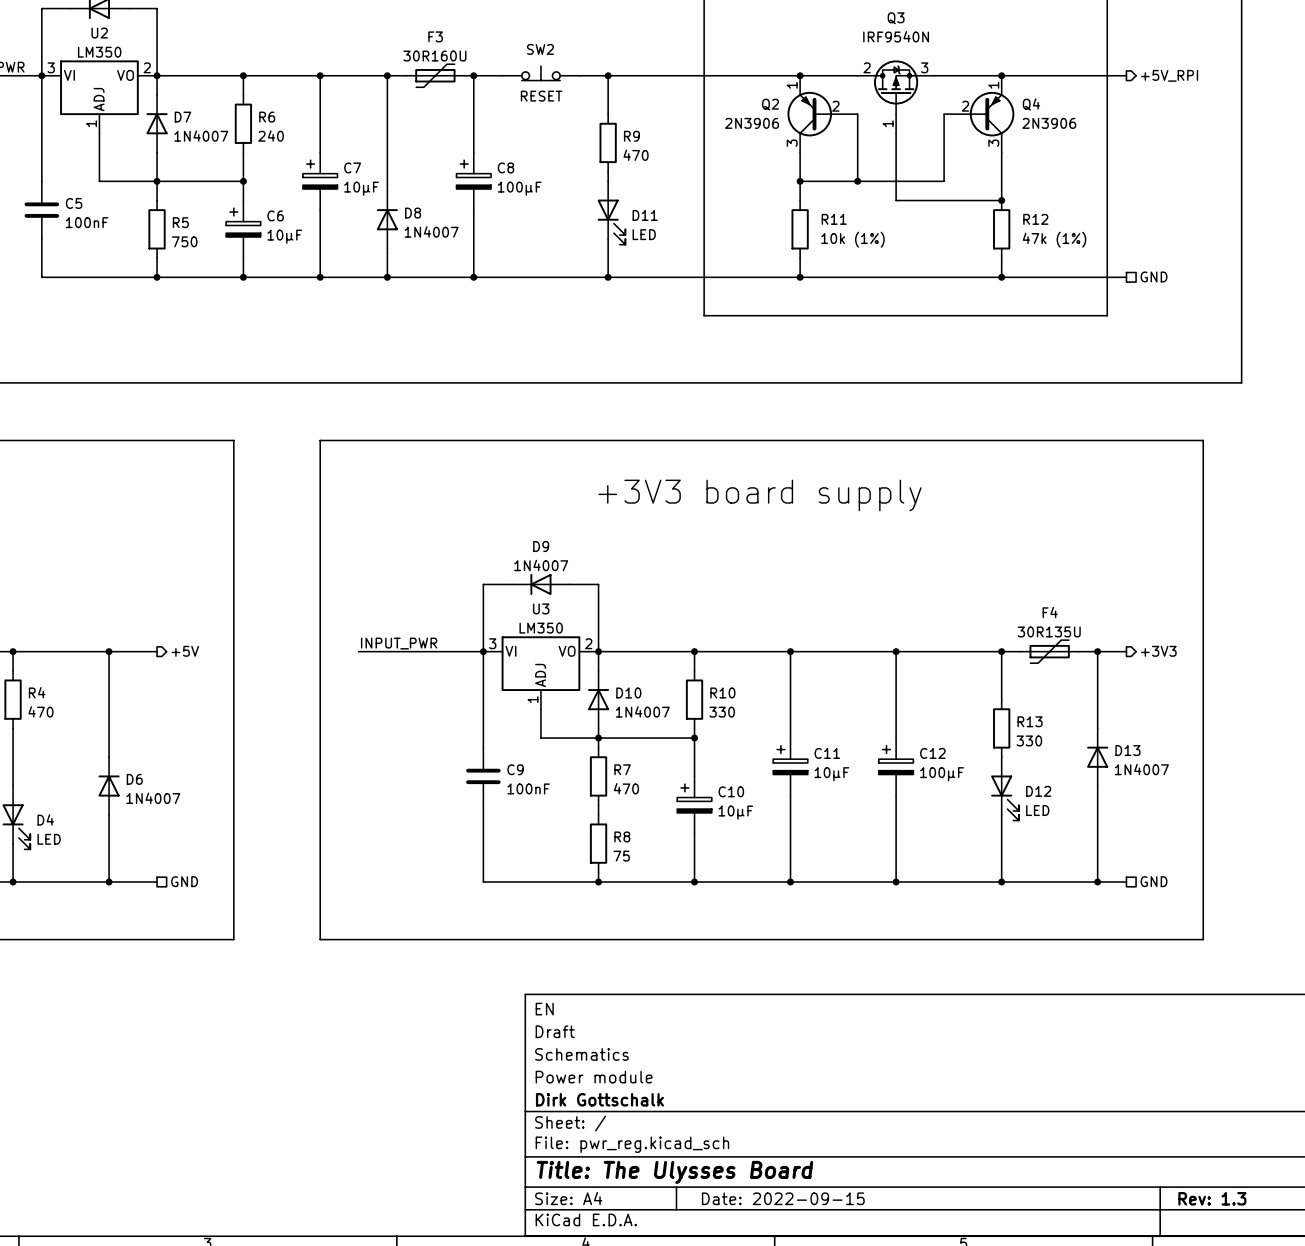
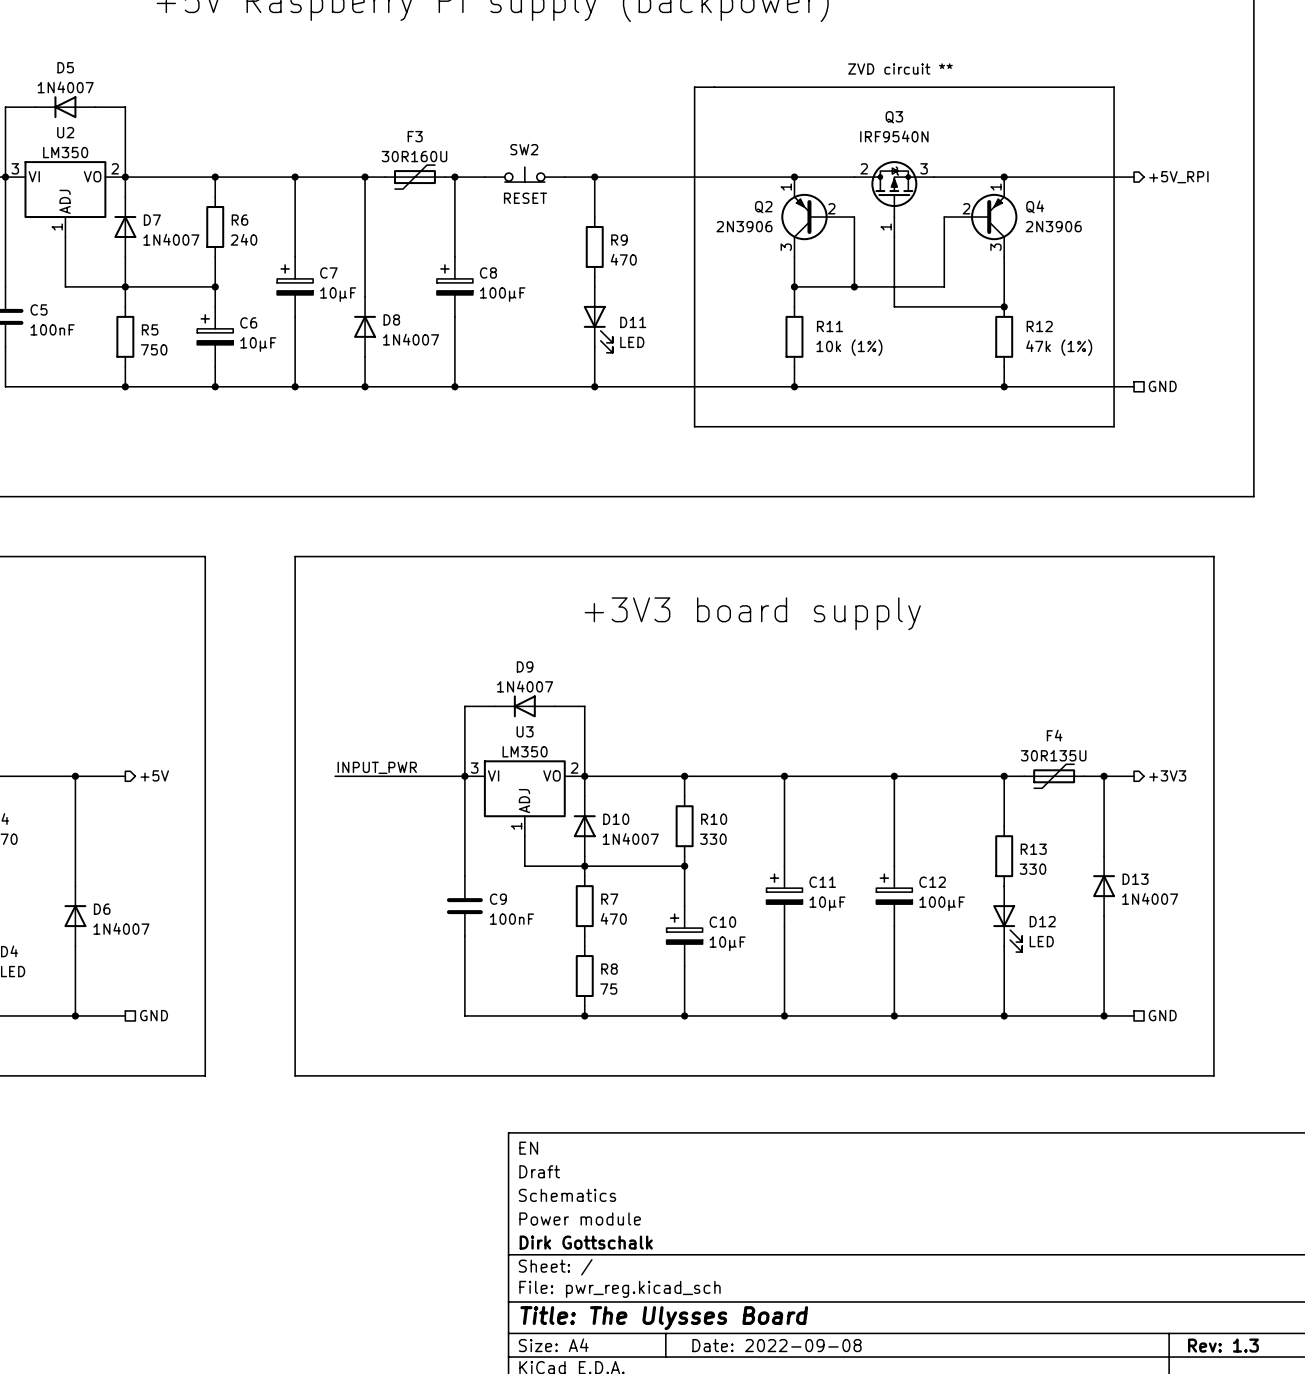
title block: Date: 2022-09-15 (783, 1198) -> Date: 2022-09-08 (776, 1345)

